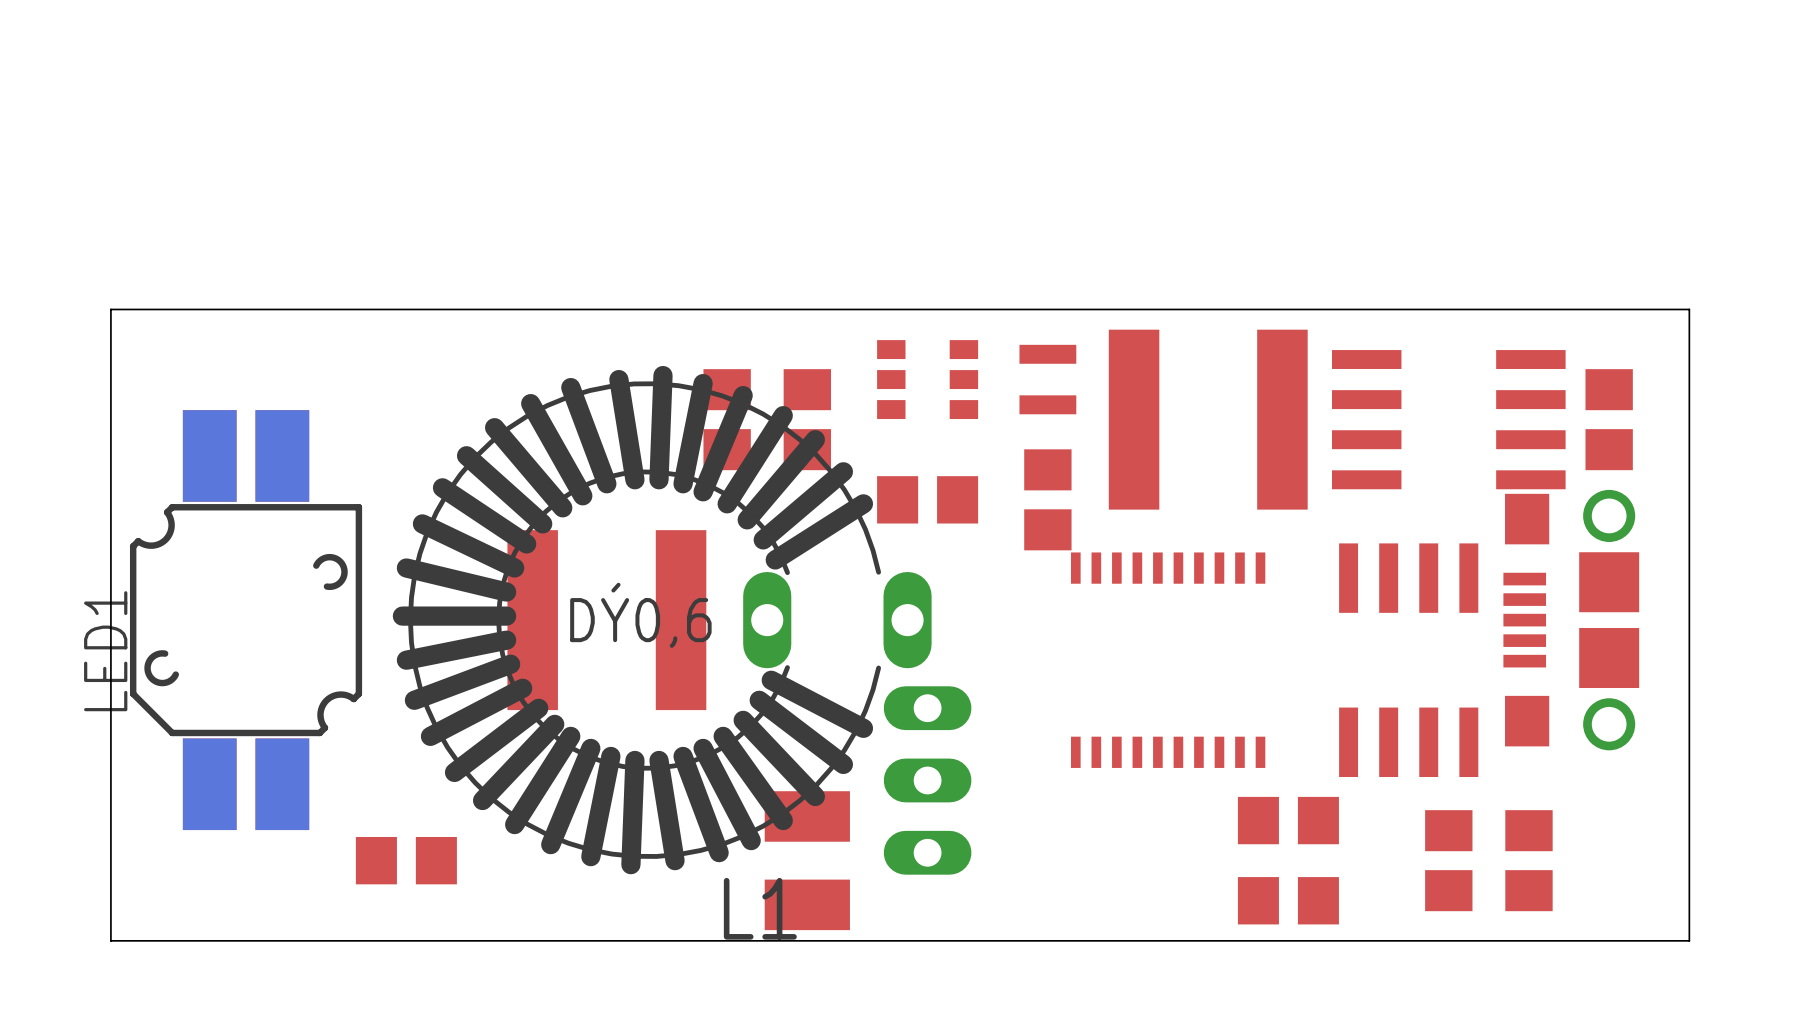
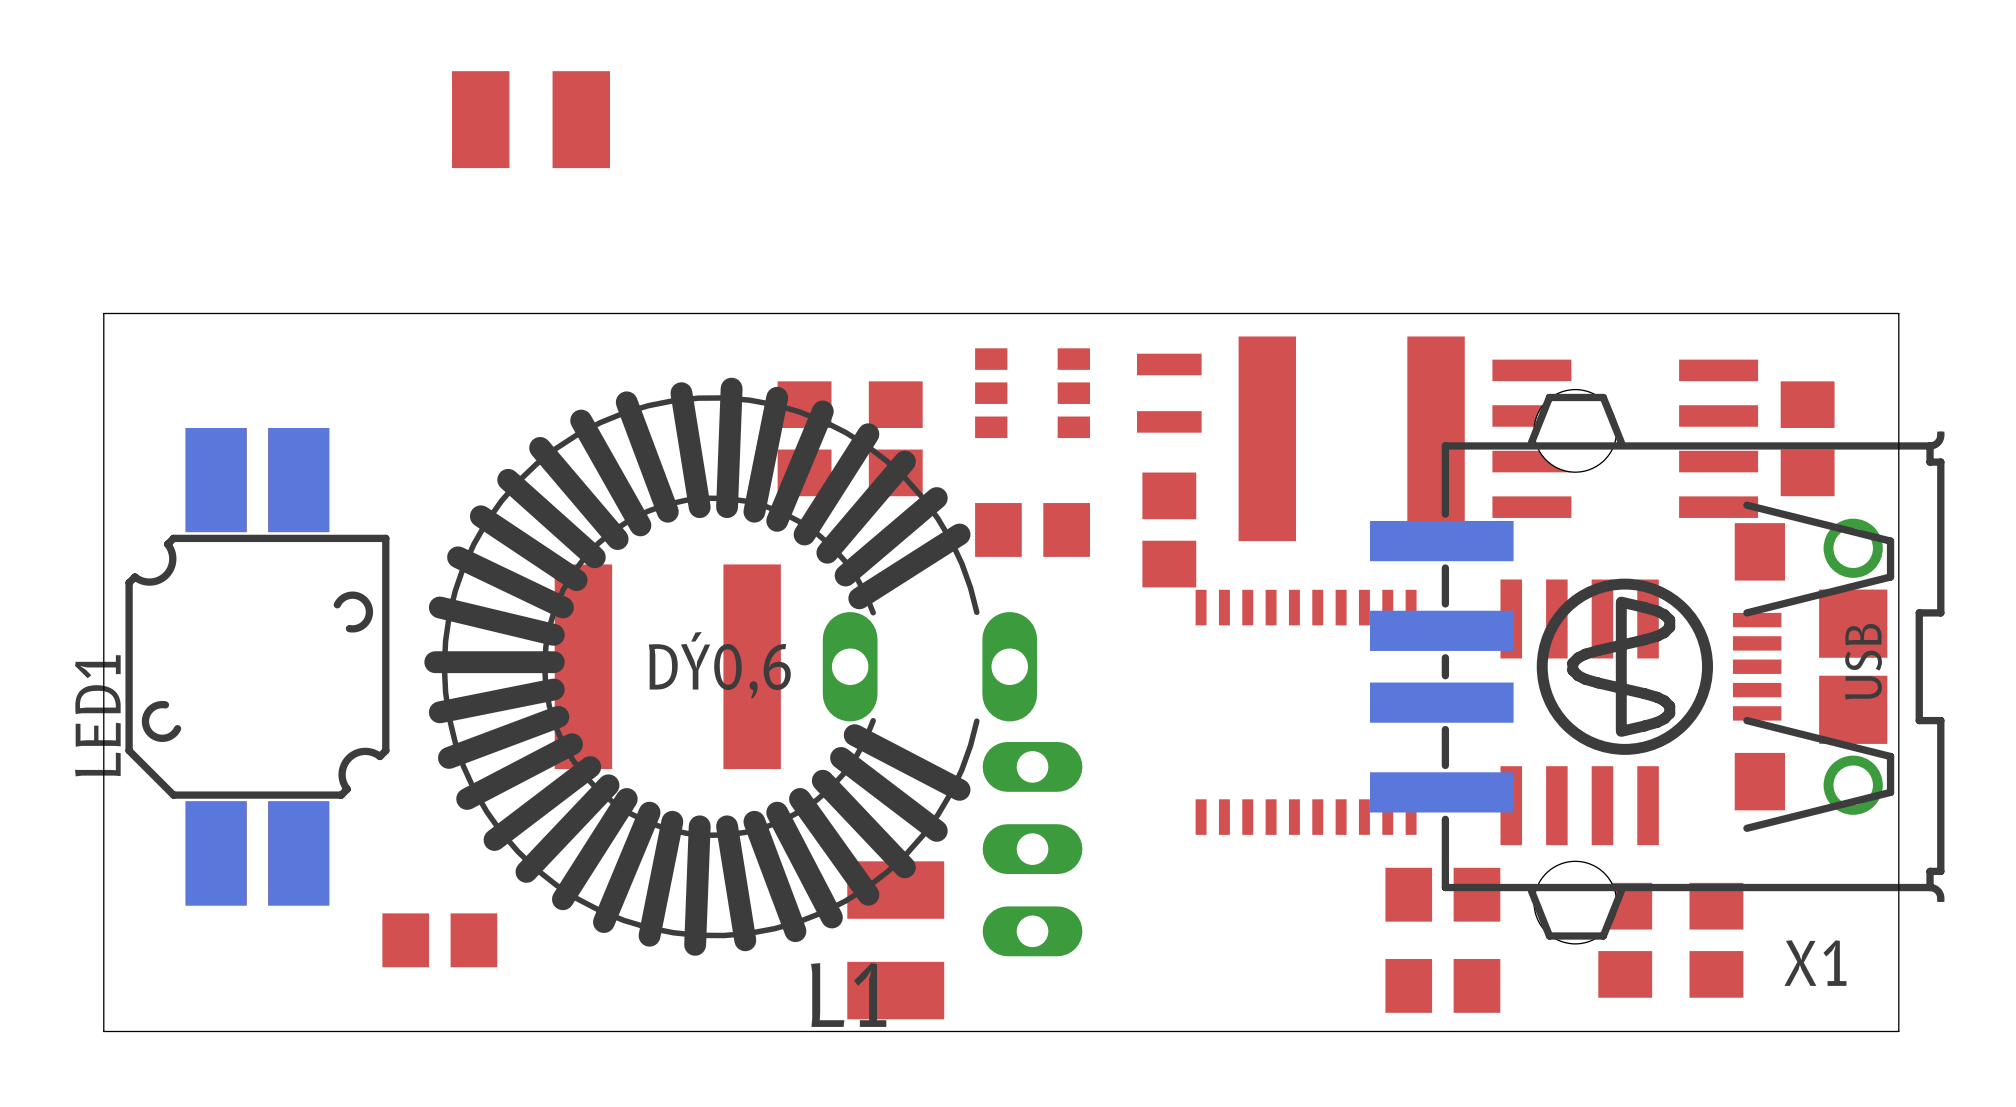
part: none -> (531, 119)
X1: none -> (1657, 666)
part position: (1571, 620) -> (1810, 666)

